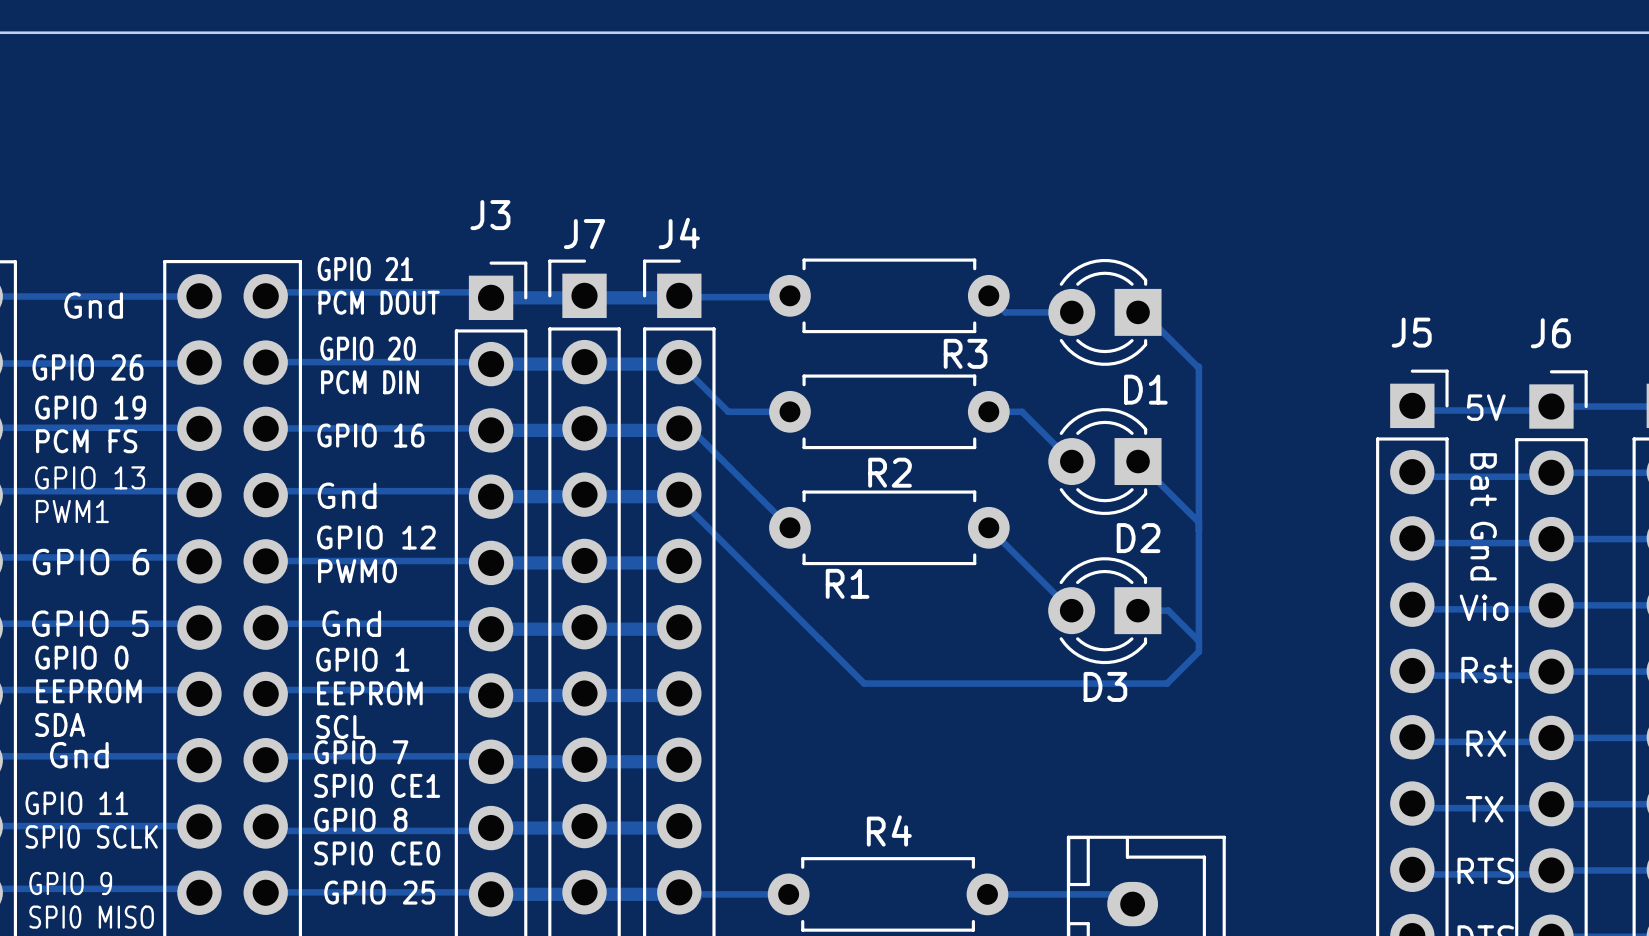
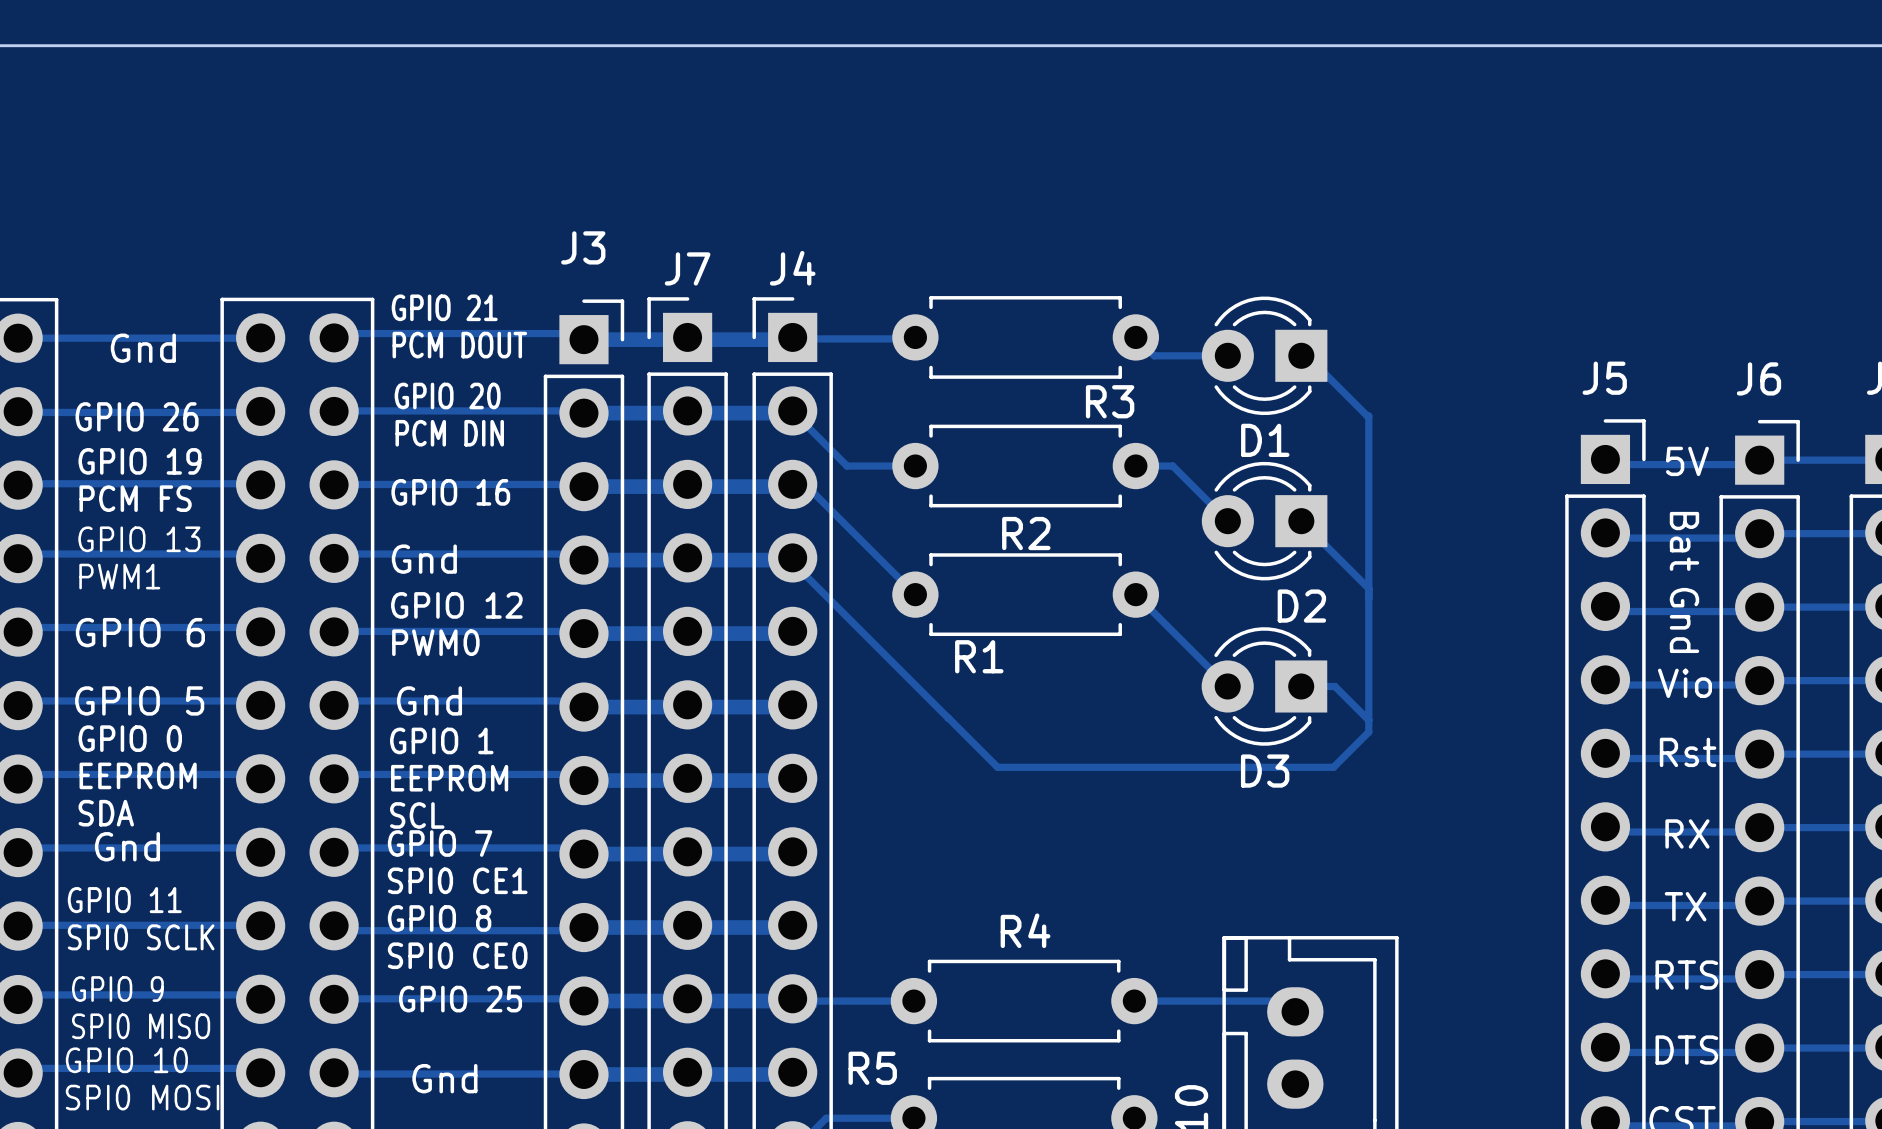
D1 name position: D1 (1145, 389) -> D1 (1265, 440)

